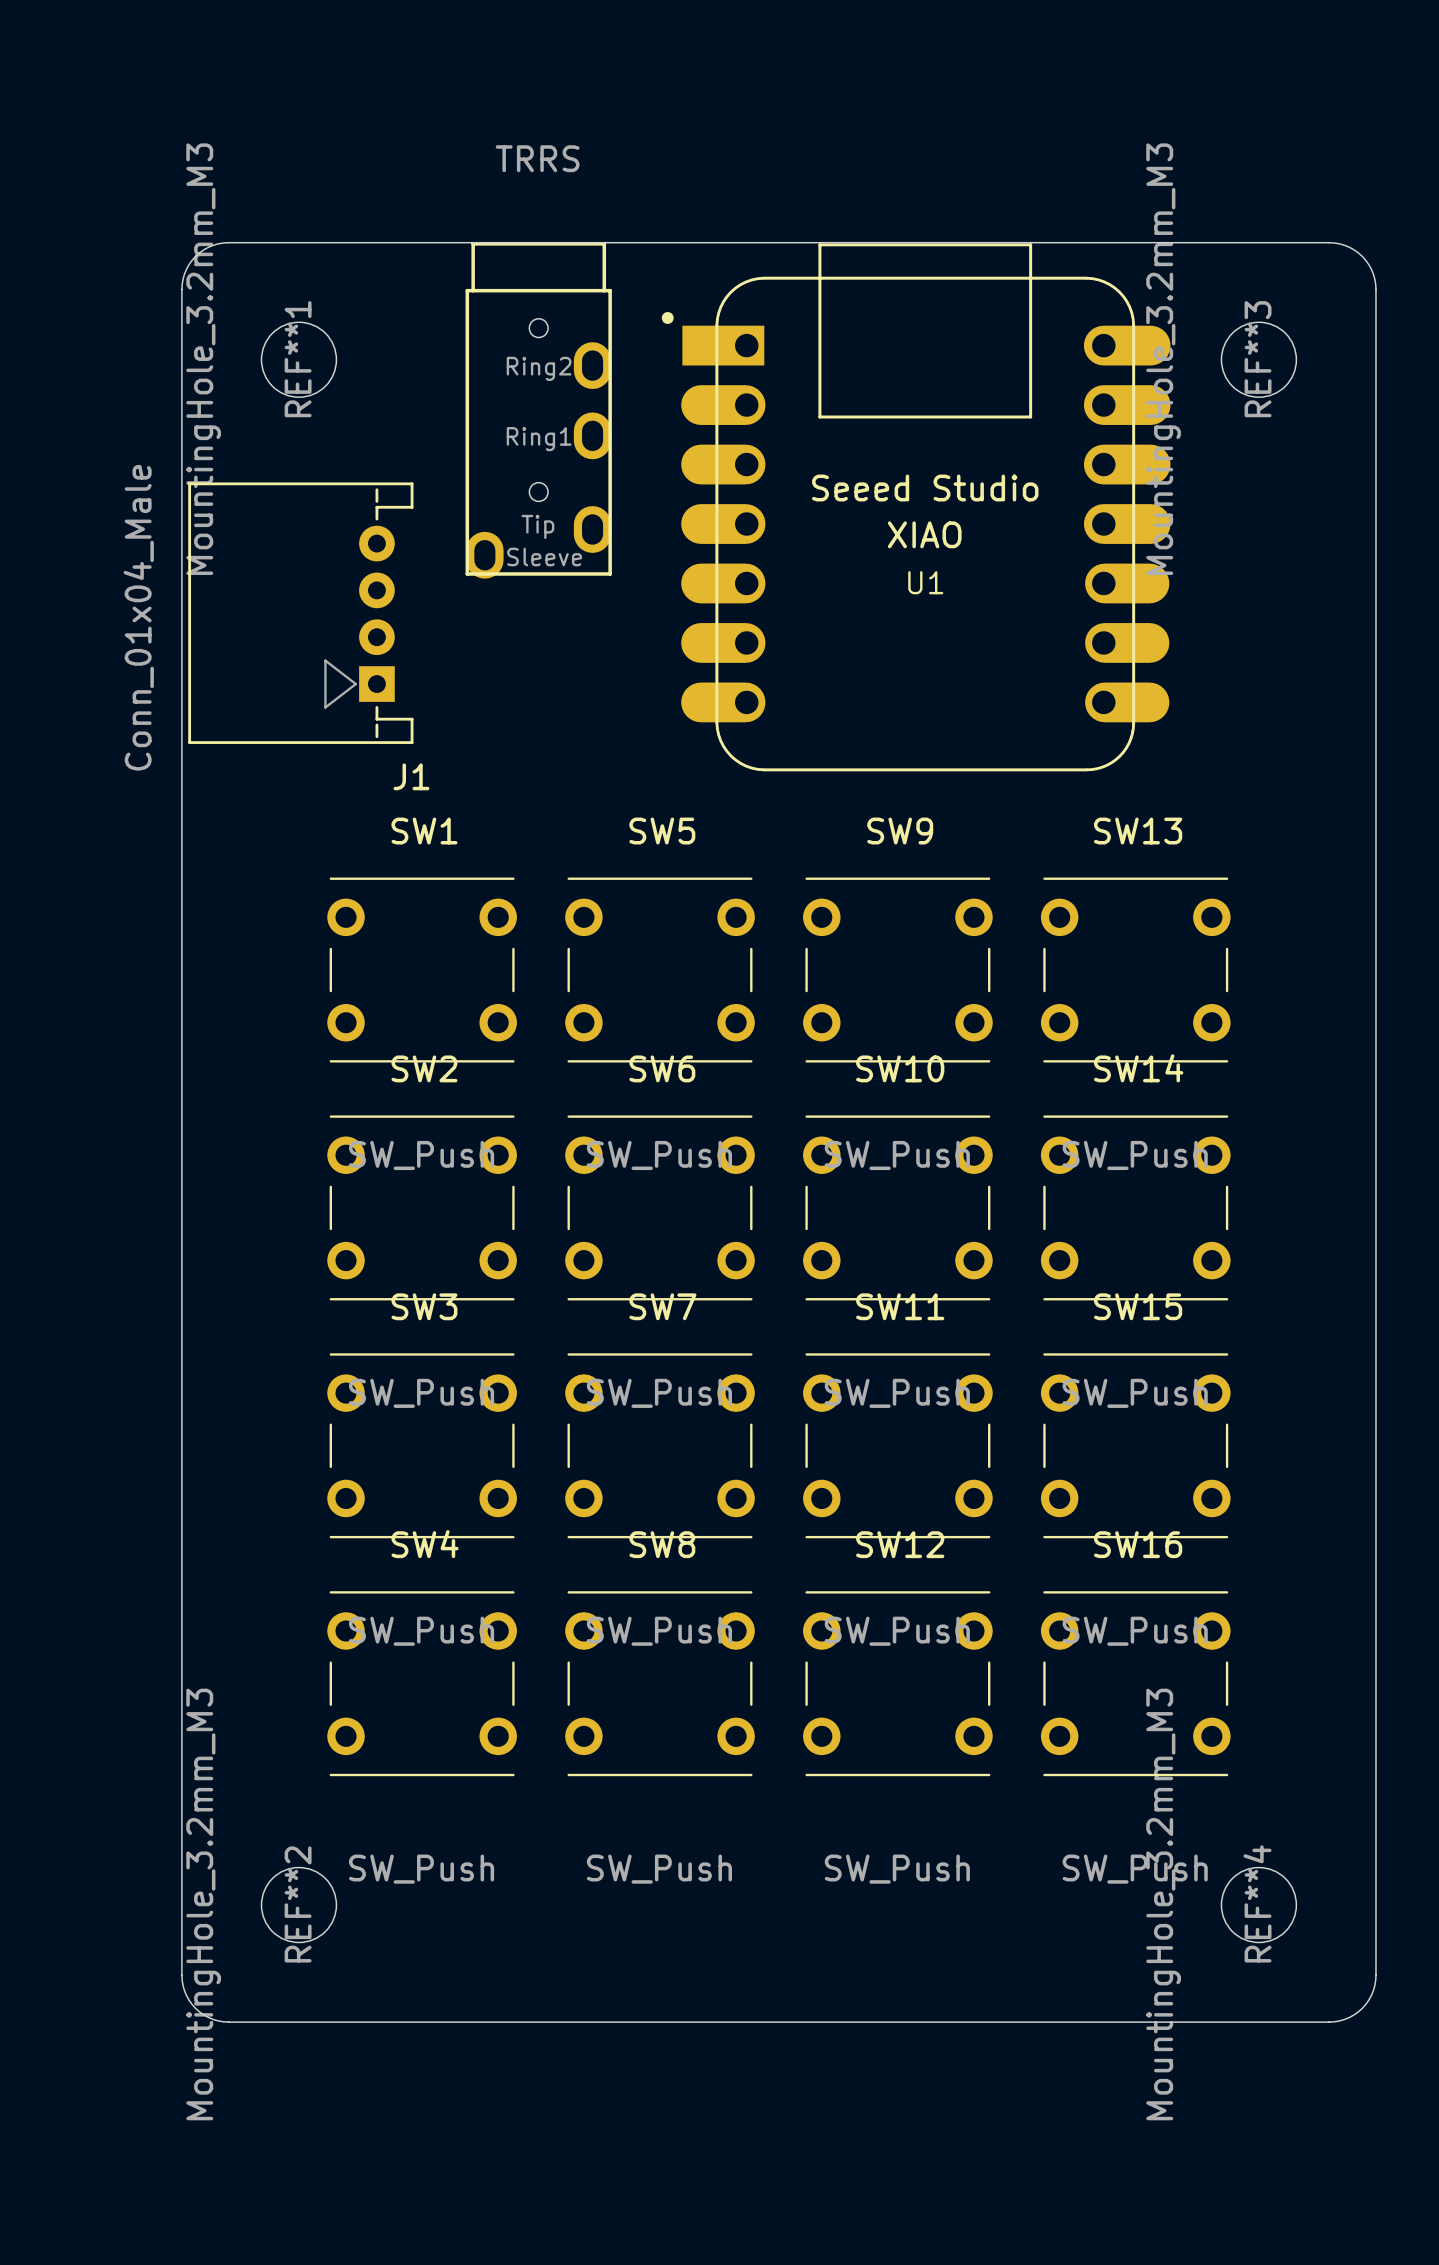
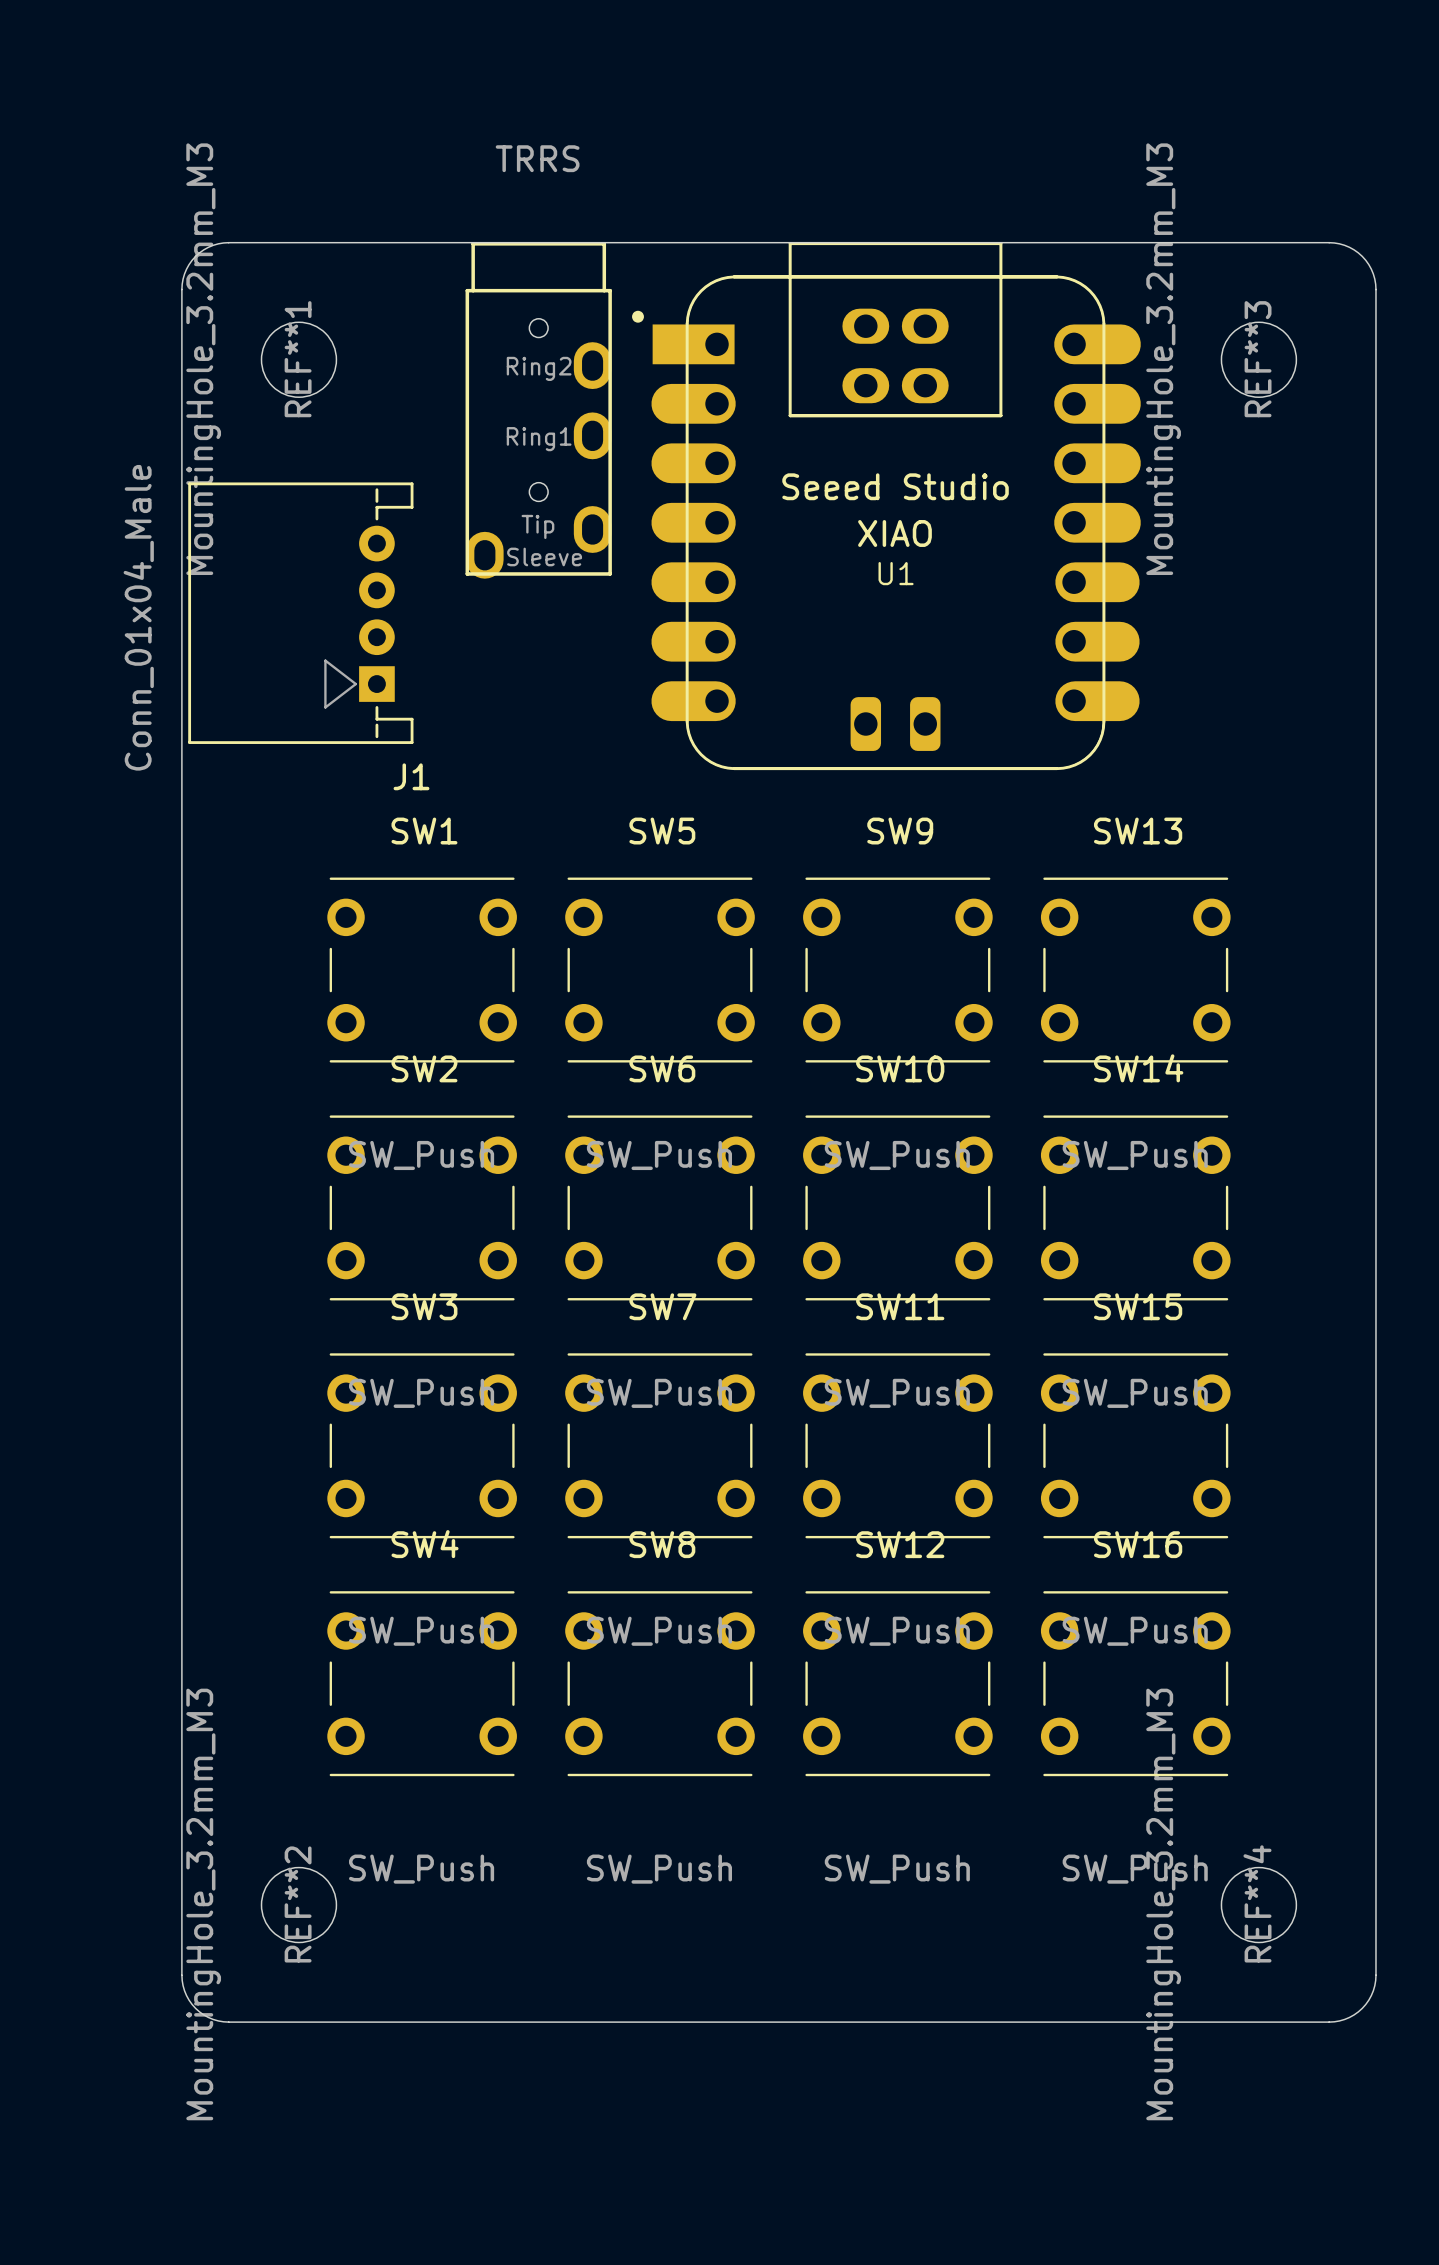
U1 footprint: [661, 243, 1171, 772] -> [632, 242, 1141, 771]

